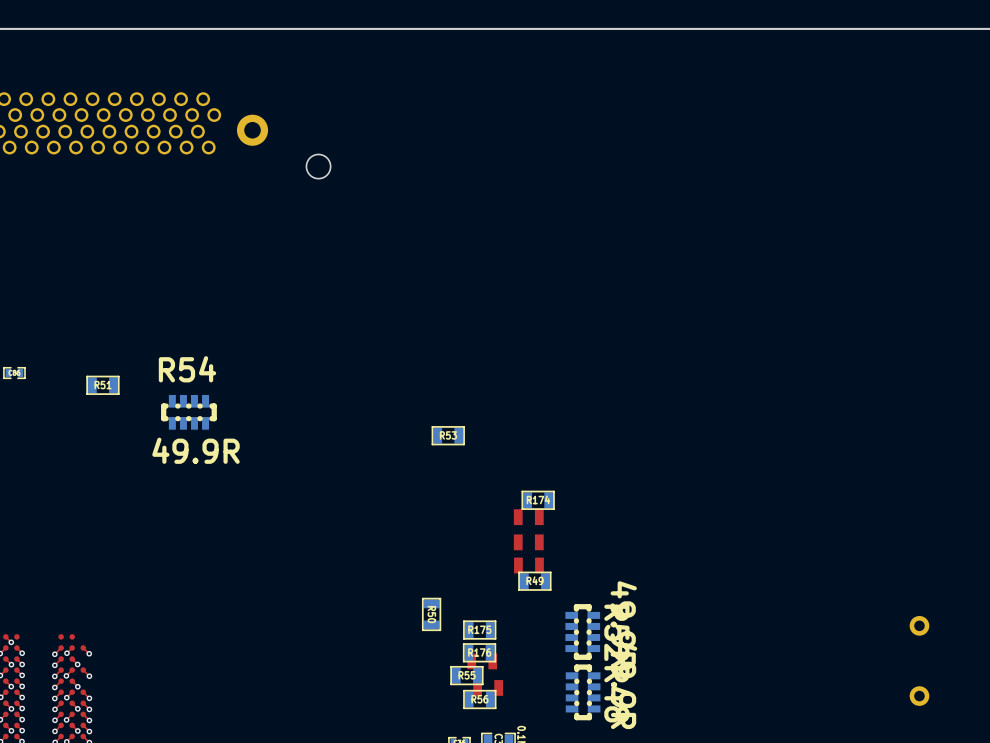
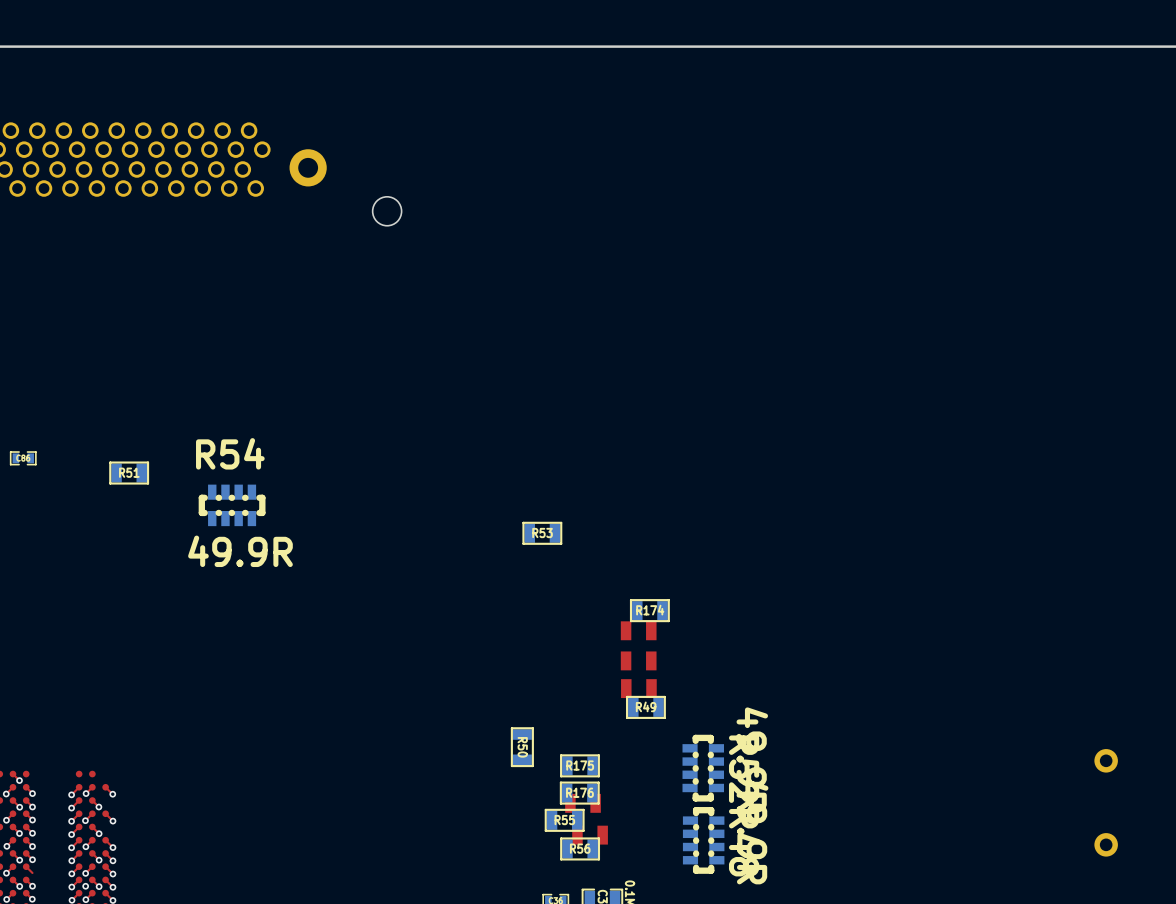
via: (22, 719) -> none
via: none -> (85, 886)

